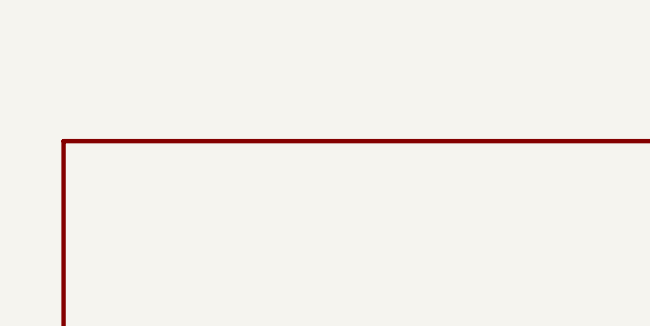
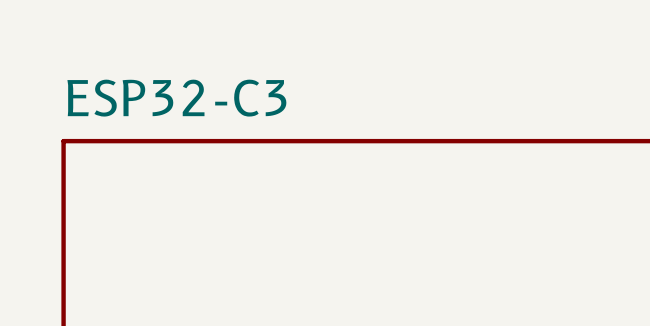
sheet ESP32-C3 name: none -> ESP32-C3 (176, 98)

